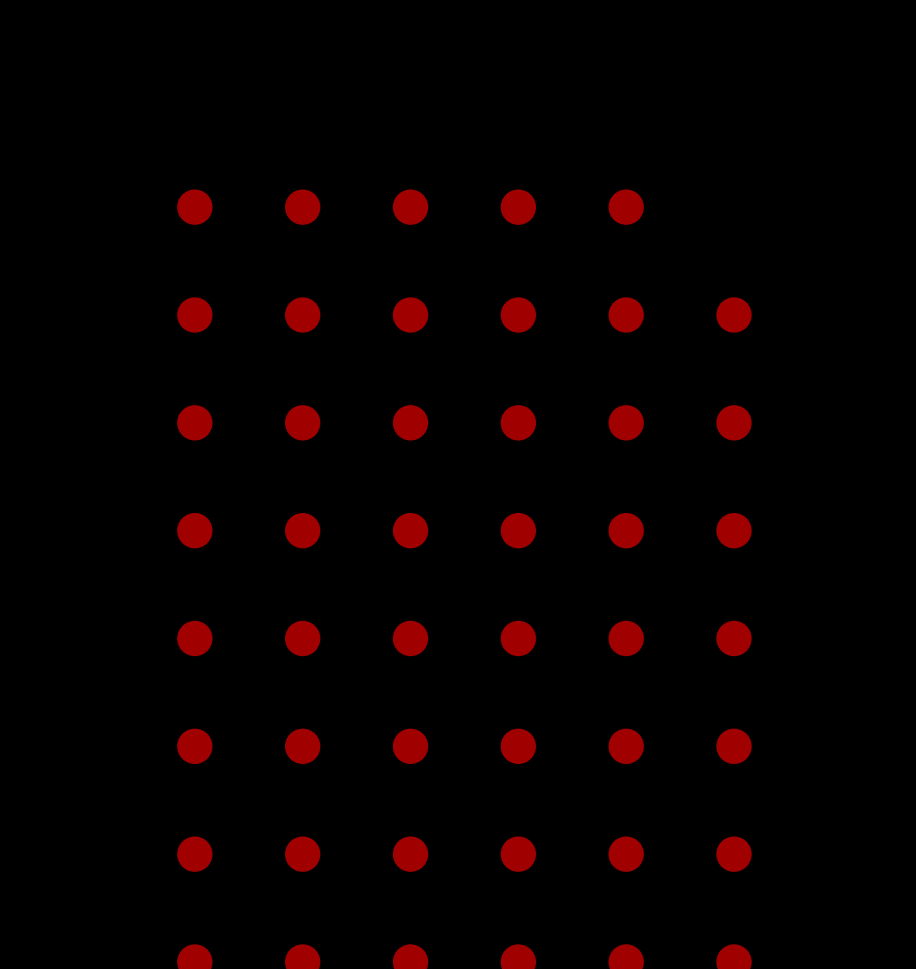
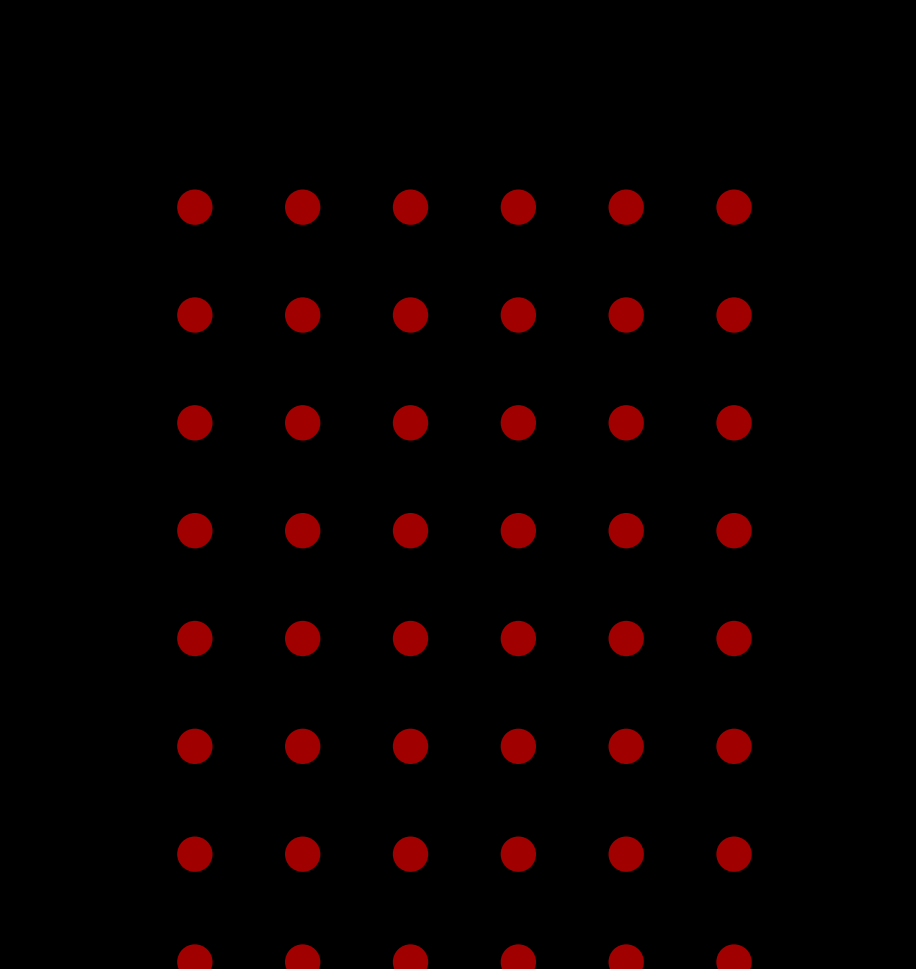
part: none -> (734, 207)

